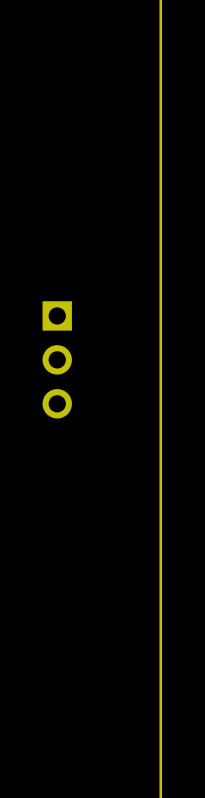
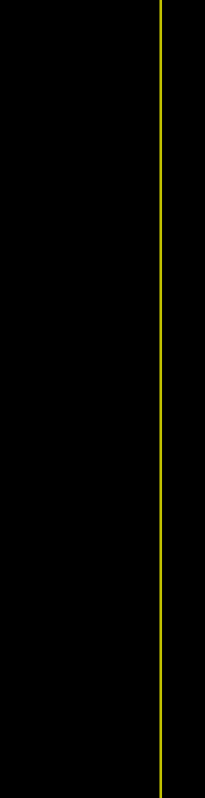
part: (57, 359) -> none

